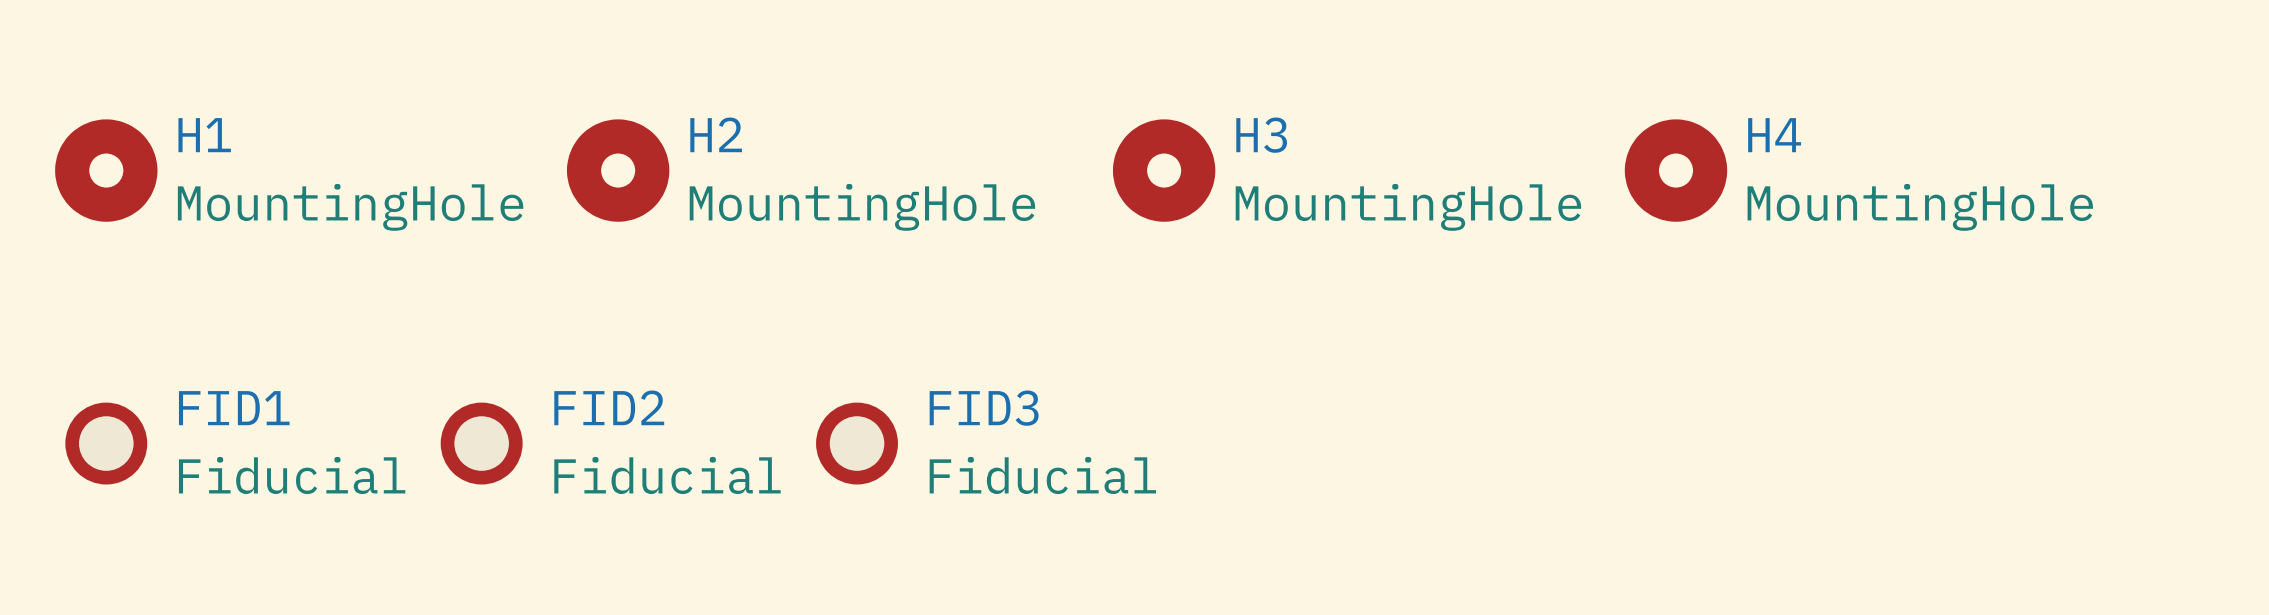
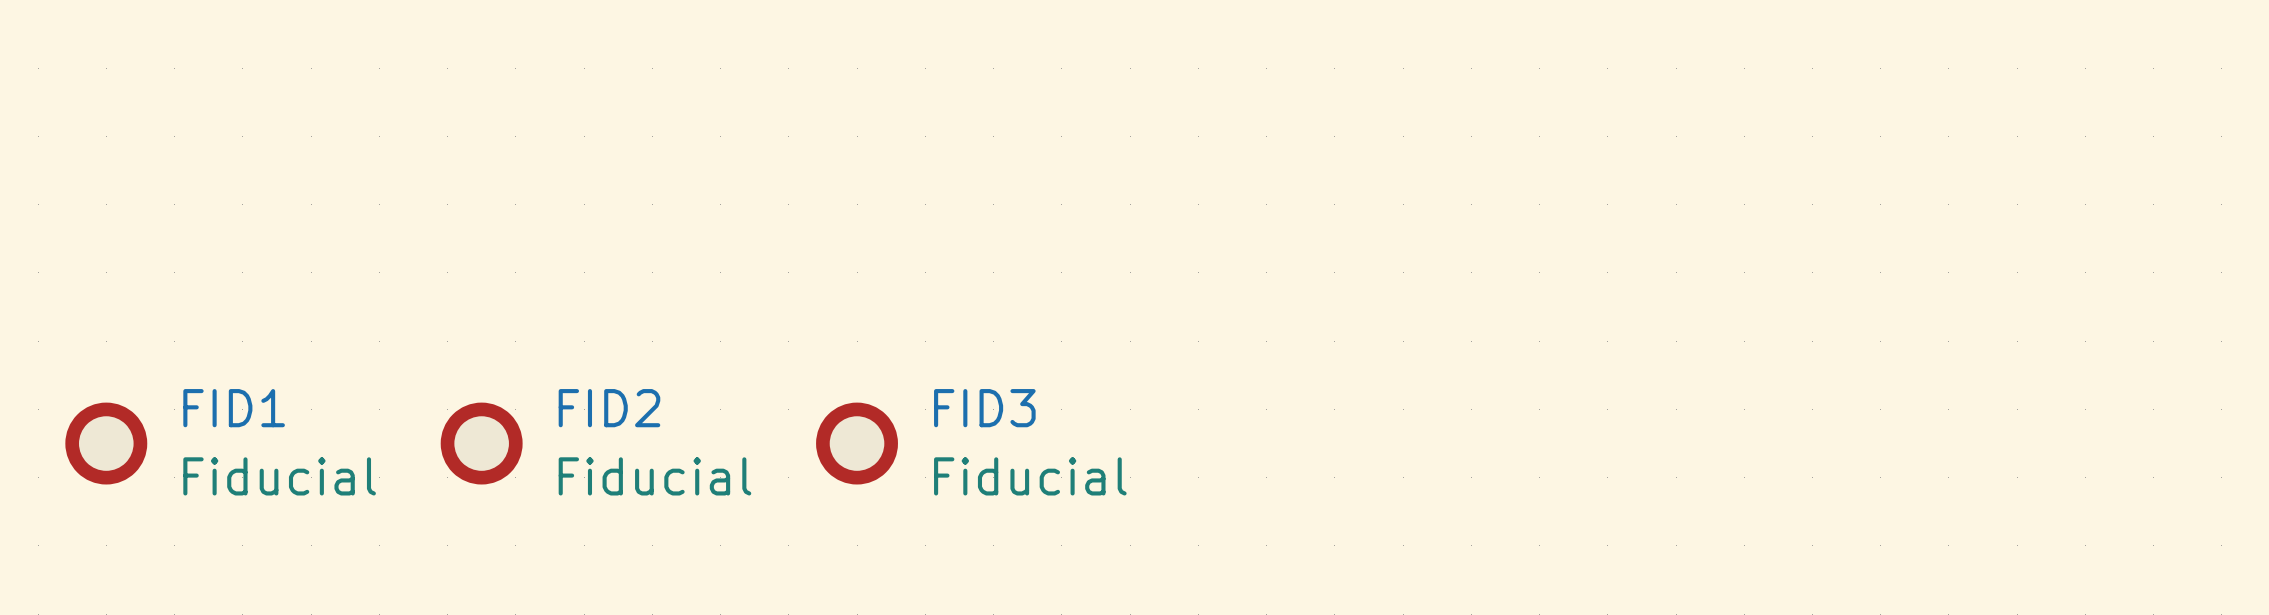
H1: MountingHole (106, 170) -> none
H2: MountingHole (618, 170) -> none
H3: MountingHole (1164, 170) -> none
H4: MountingHole (1676, 170) -> none

